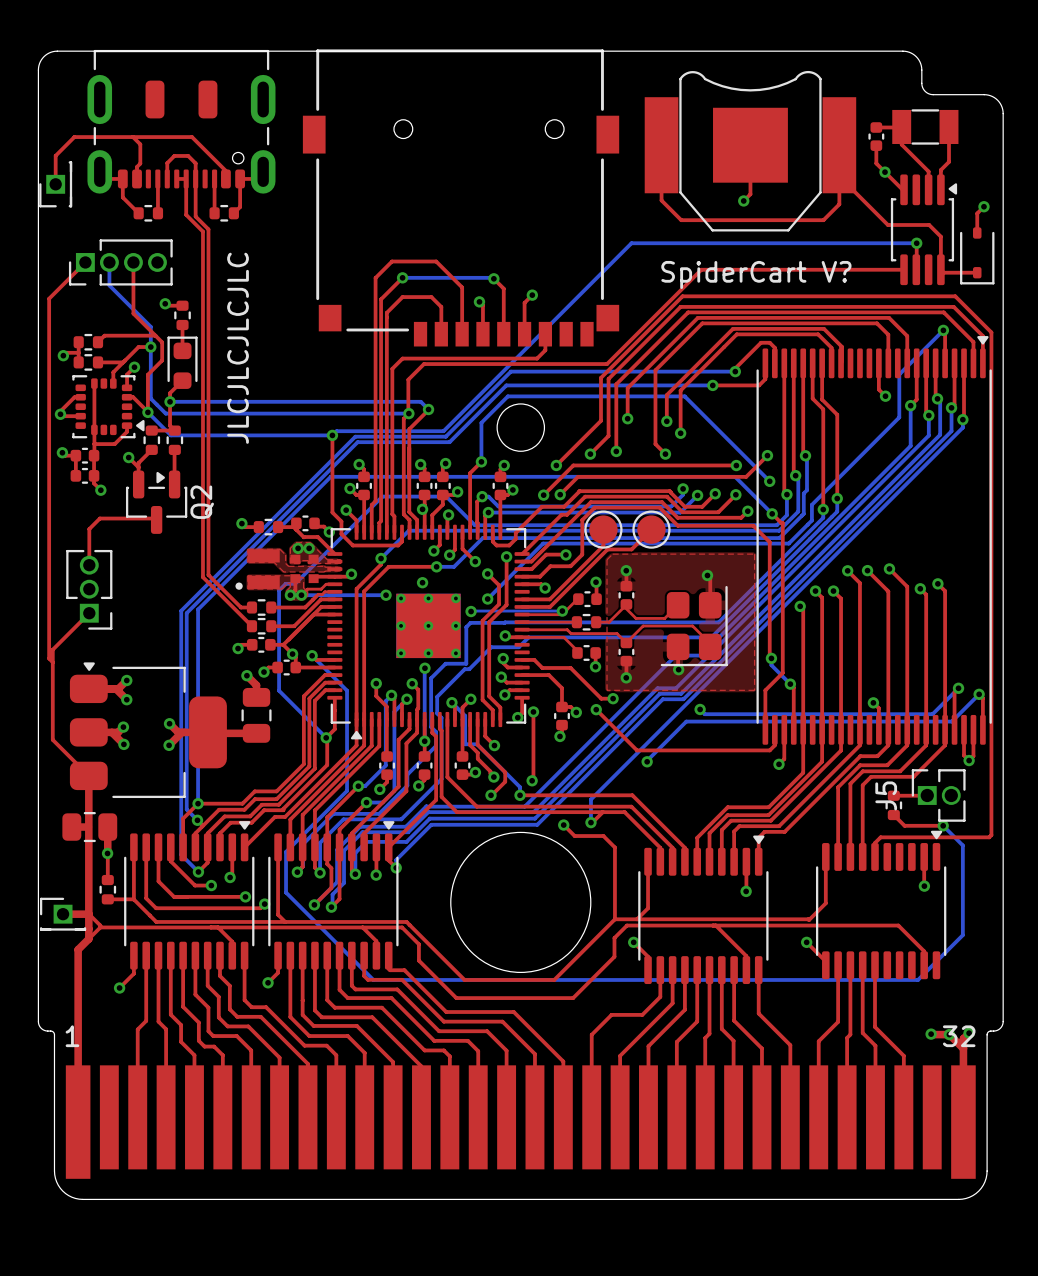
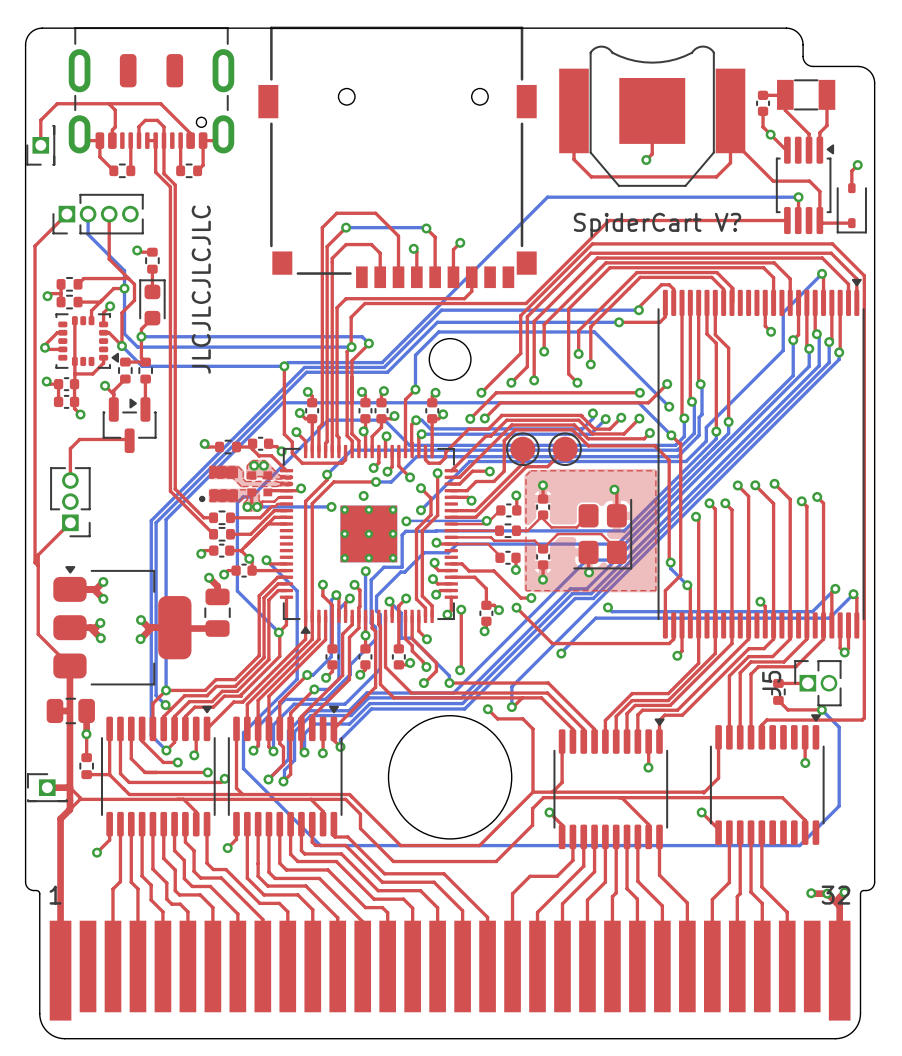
Q2 name: Q2 (202, 502) -> none

